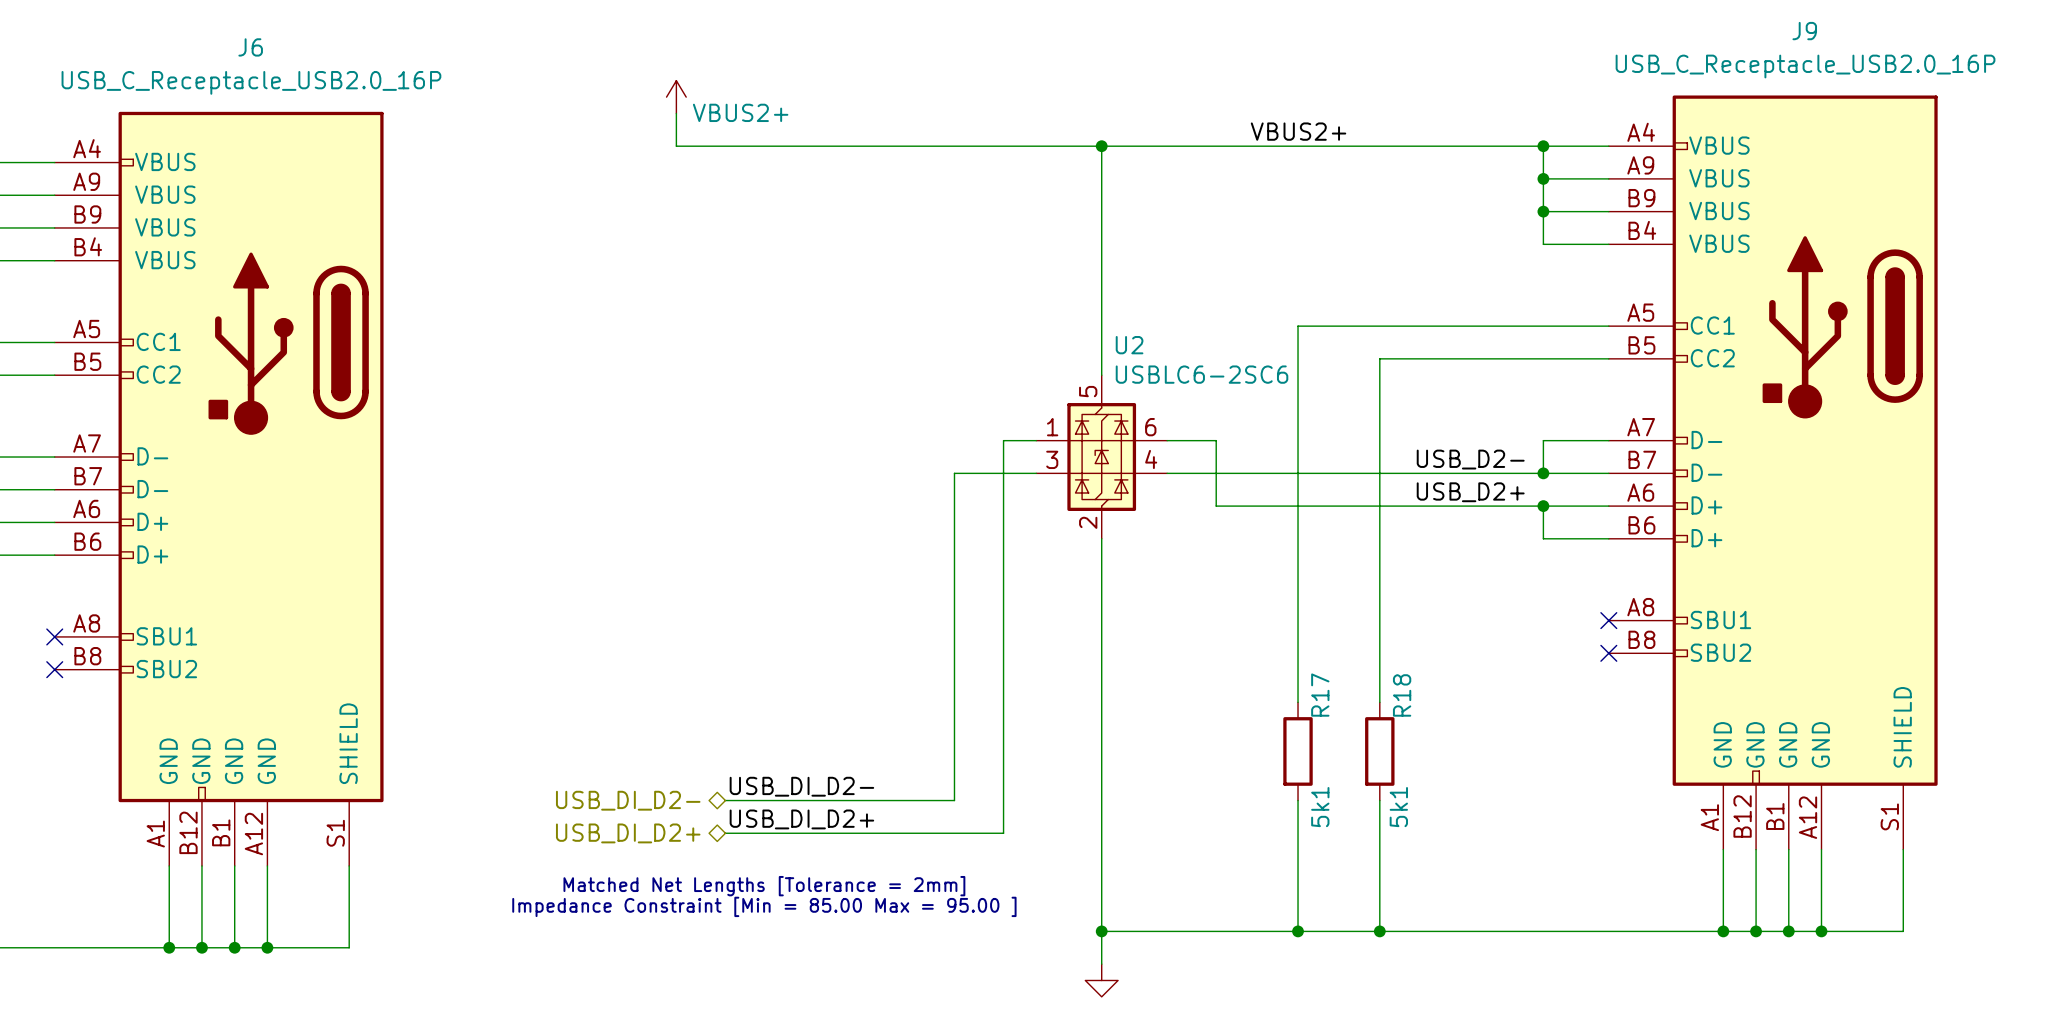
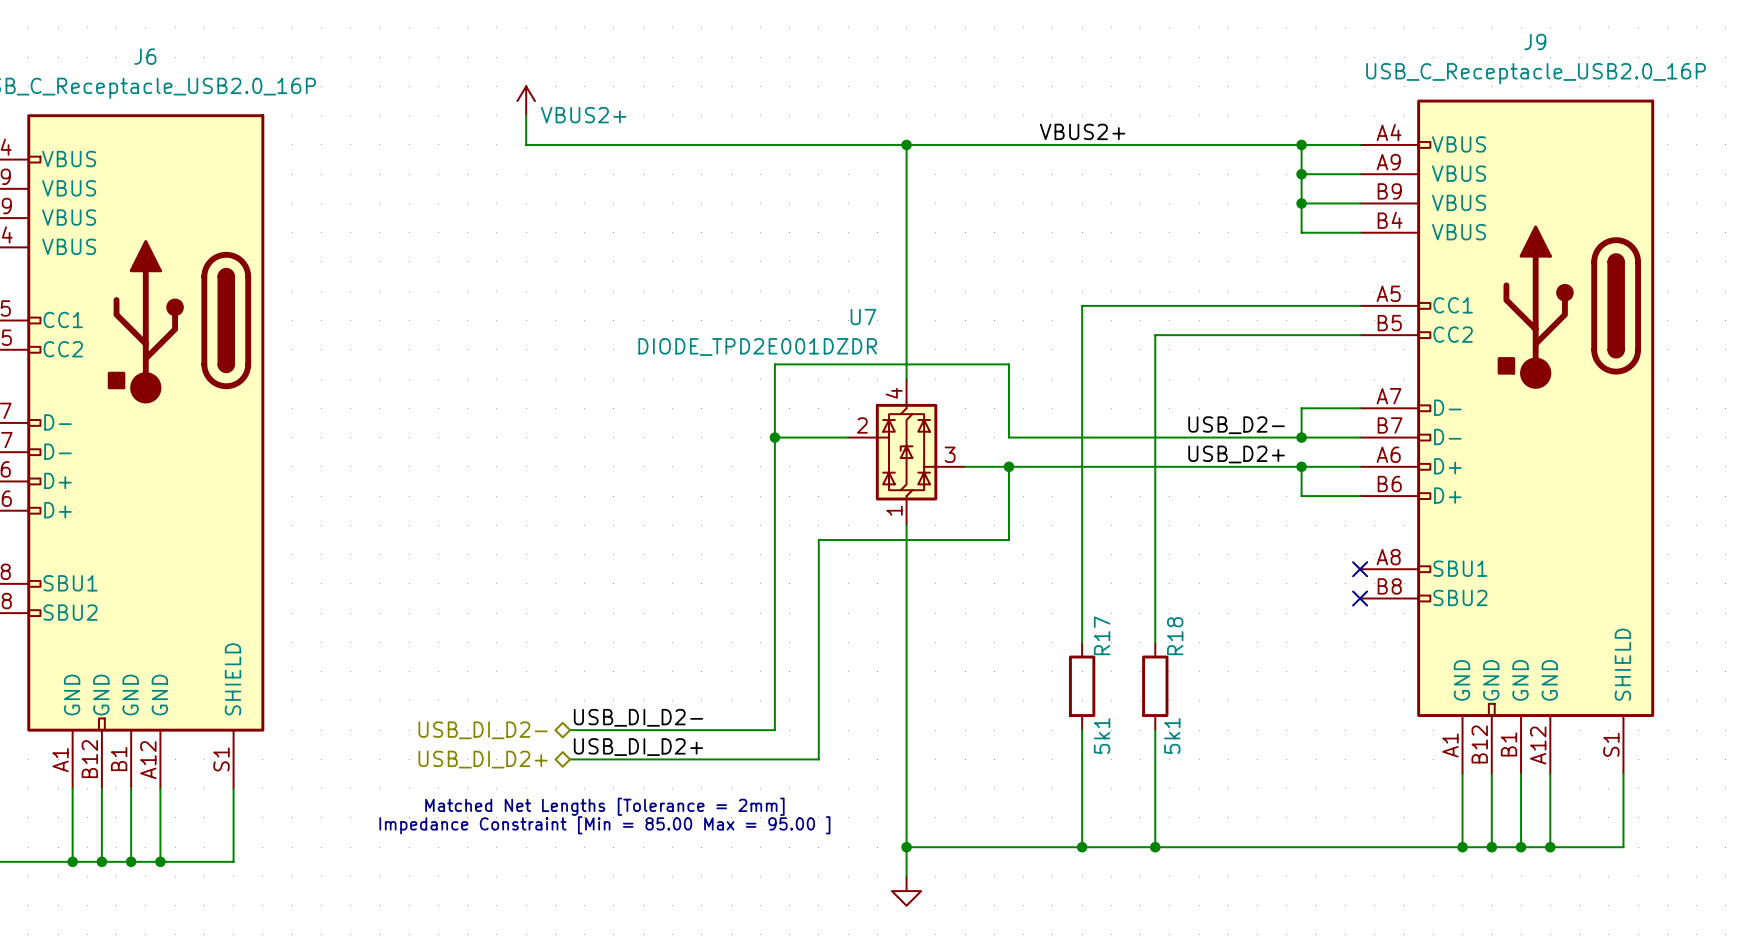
wire: (1036, 440) (1003, 440) (1003, 587) -> (965, 466) (1008, 466) (1008, 539) (818, 539)
wire: (1167, 440) (1216, 440) -> (774, 437) (774, 364) (1008, 364) (1008, 408)
U2: USBLC6-2SC6 (1101, 457) -> none
junction: none -> (774, 437)
wire: (1167, 473) (1216, 473) (1216, 506) -> none
U7: none -> DIODE_TPD2E001DZDR (906, 452)
junction: none -> (1008, 466)

